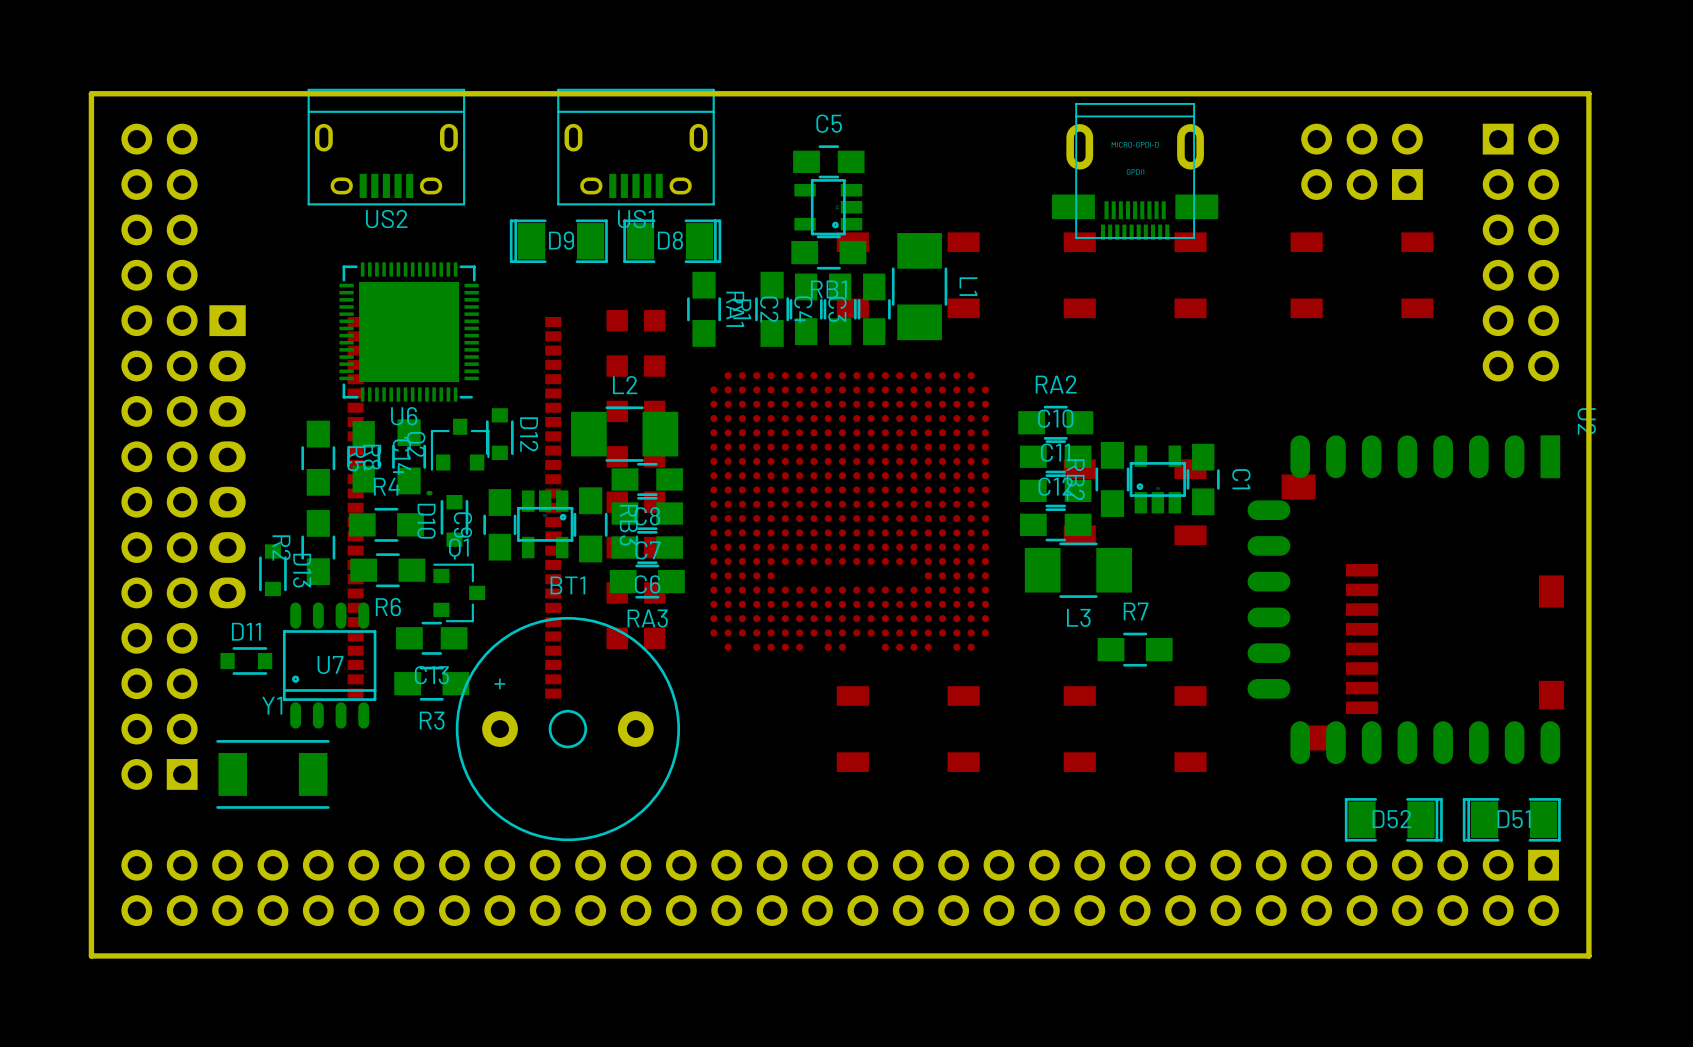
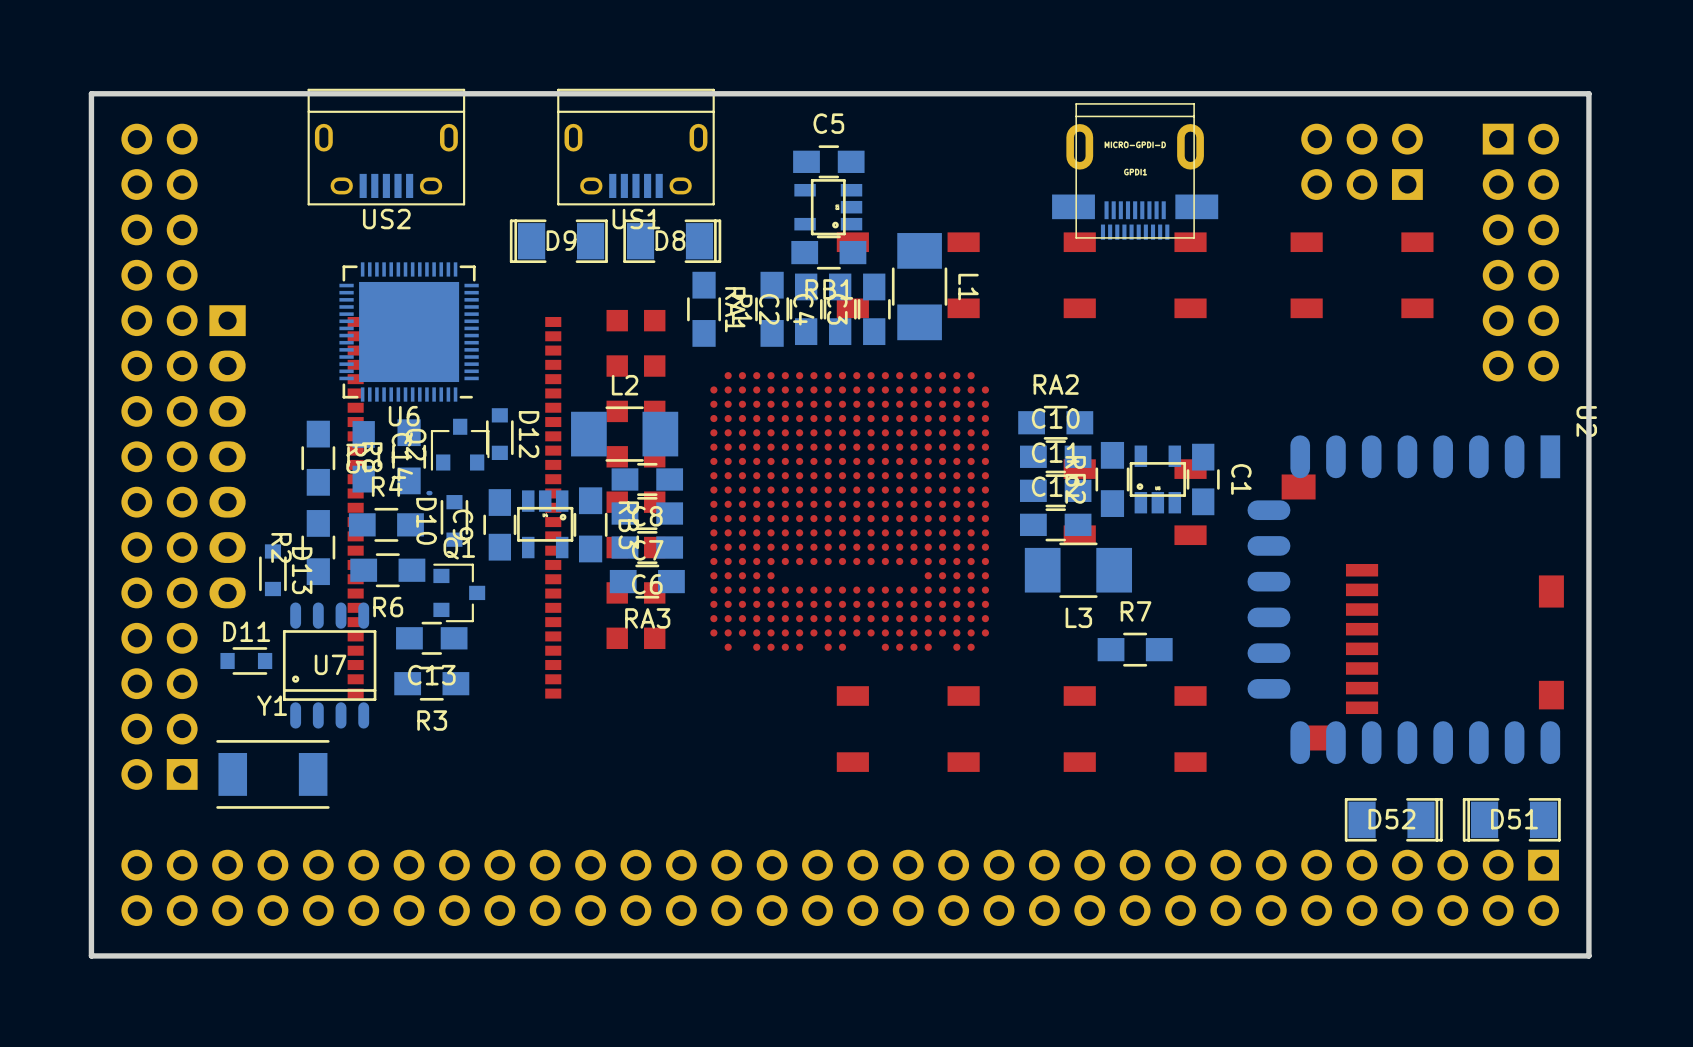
BT1: (567, 729) -> none

